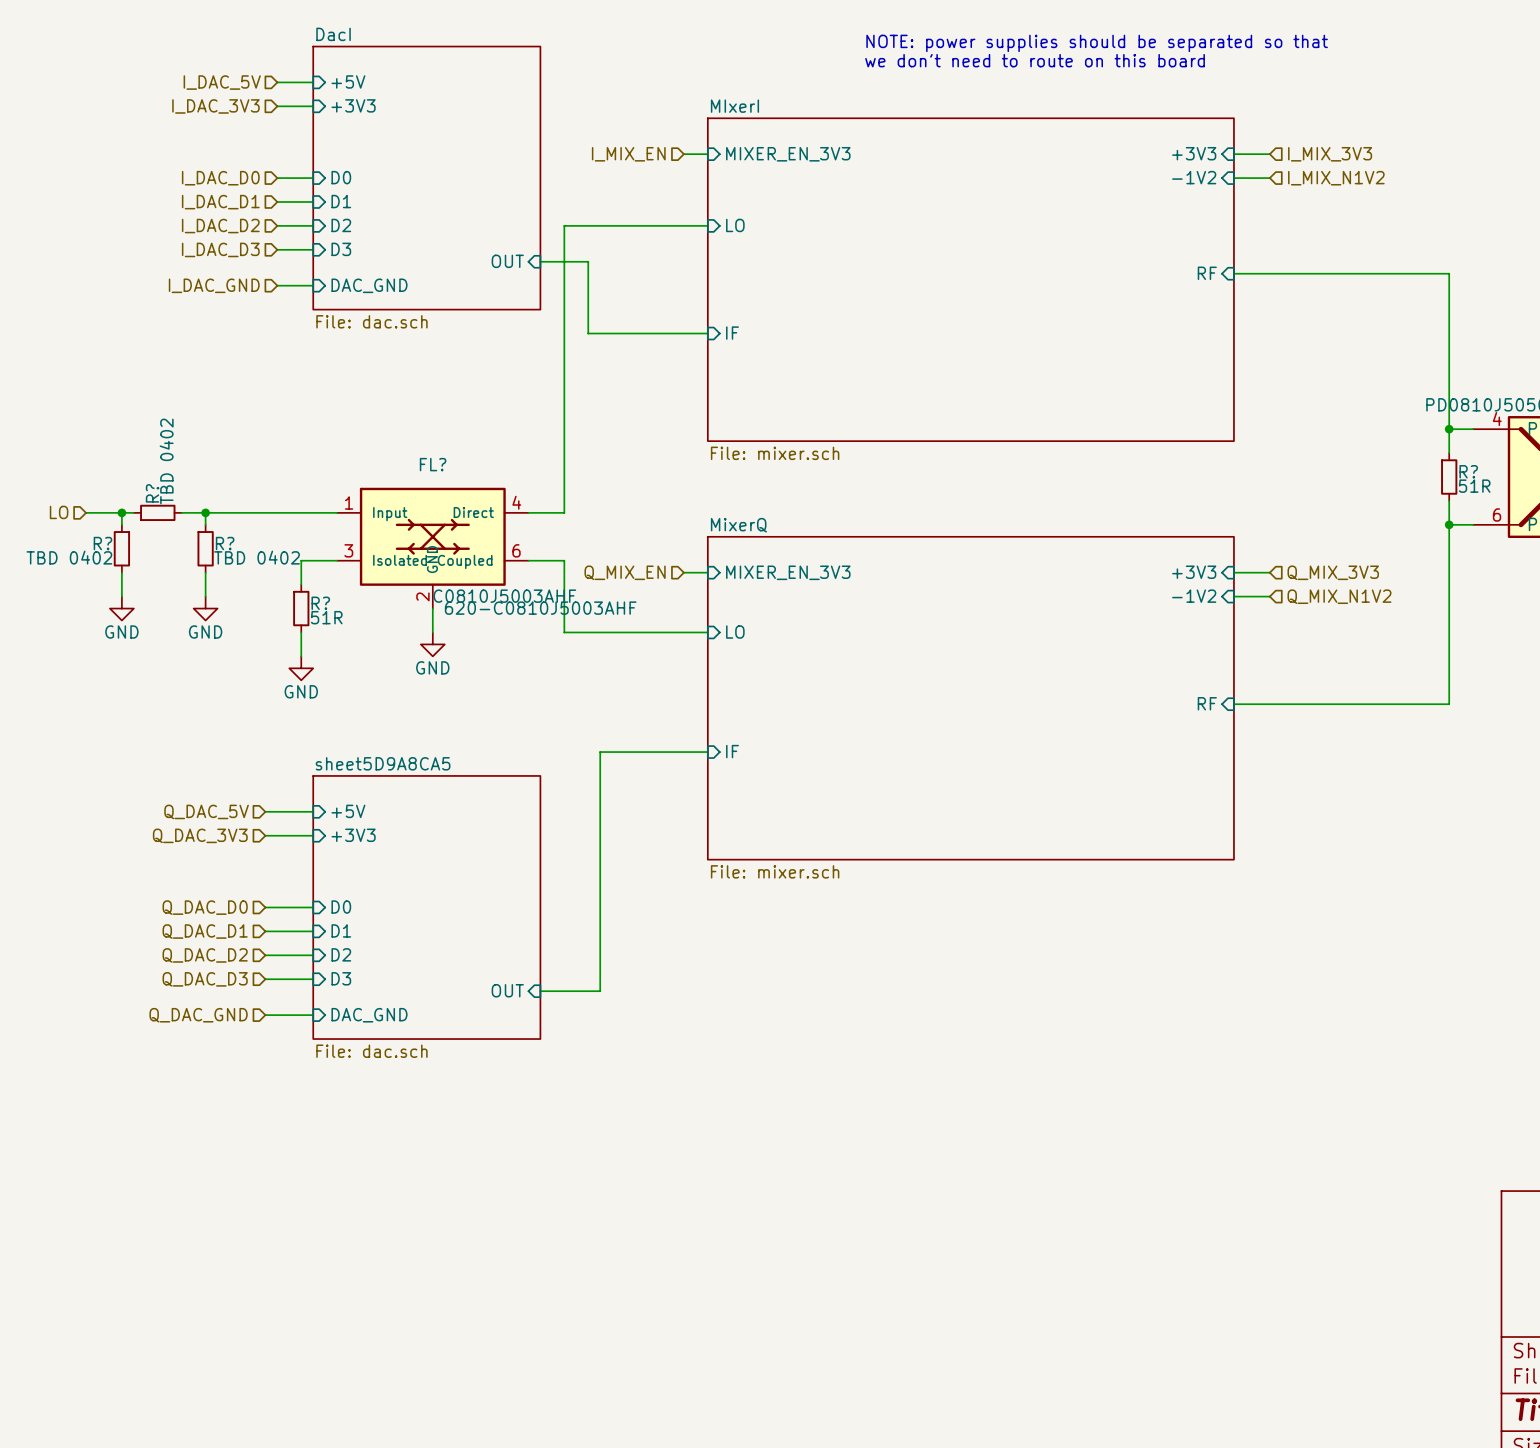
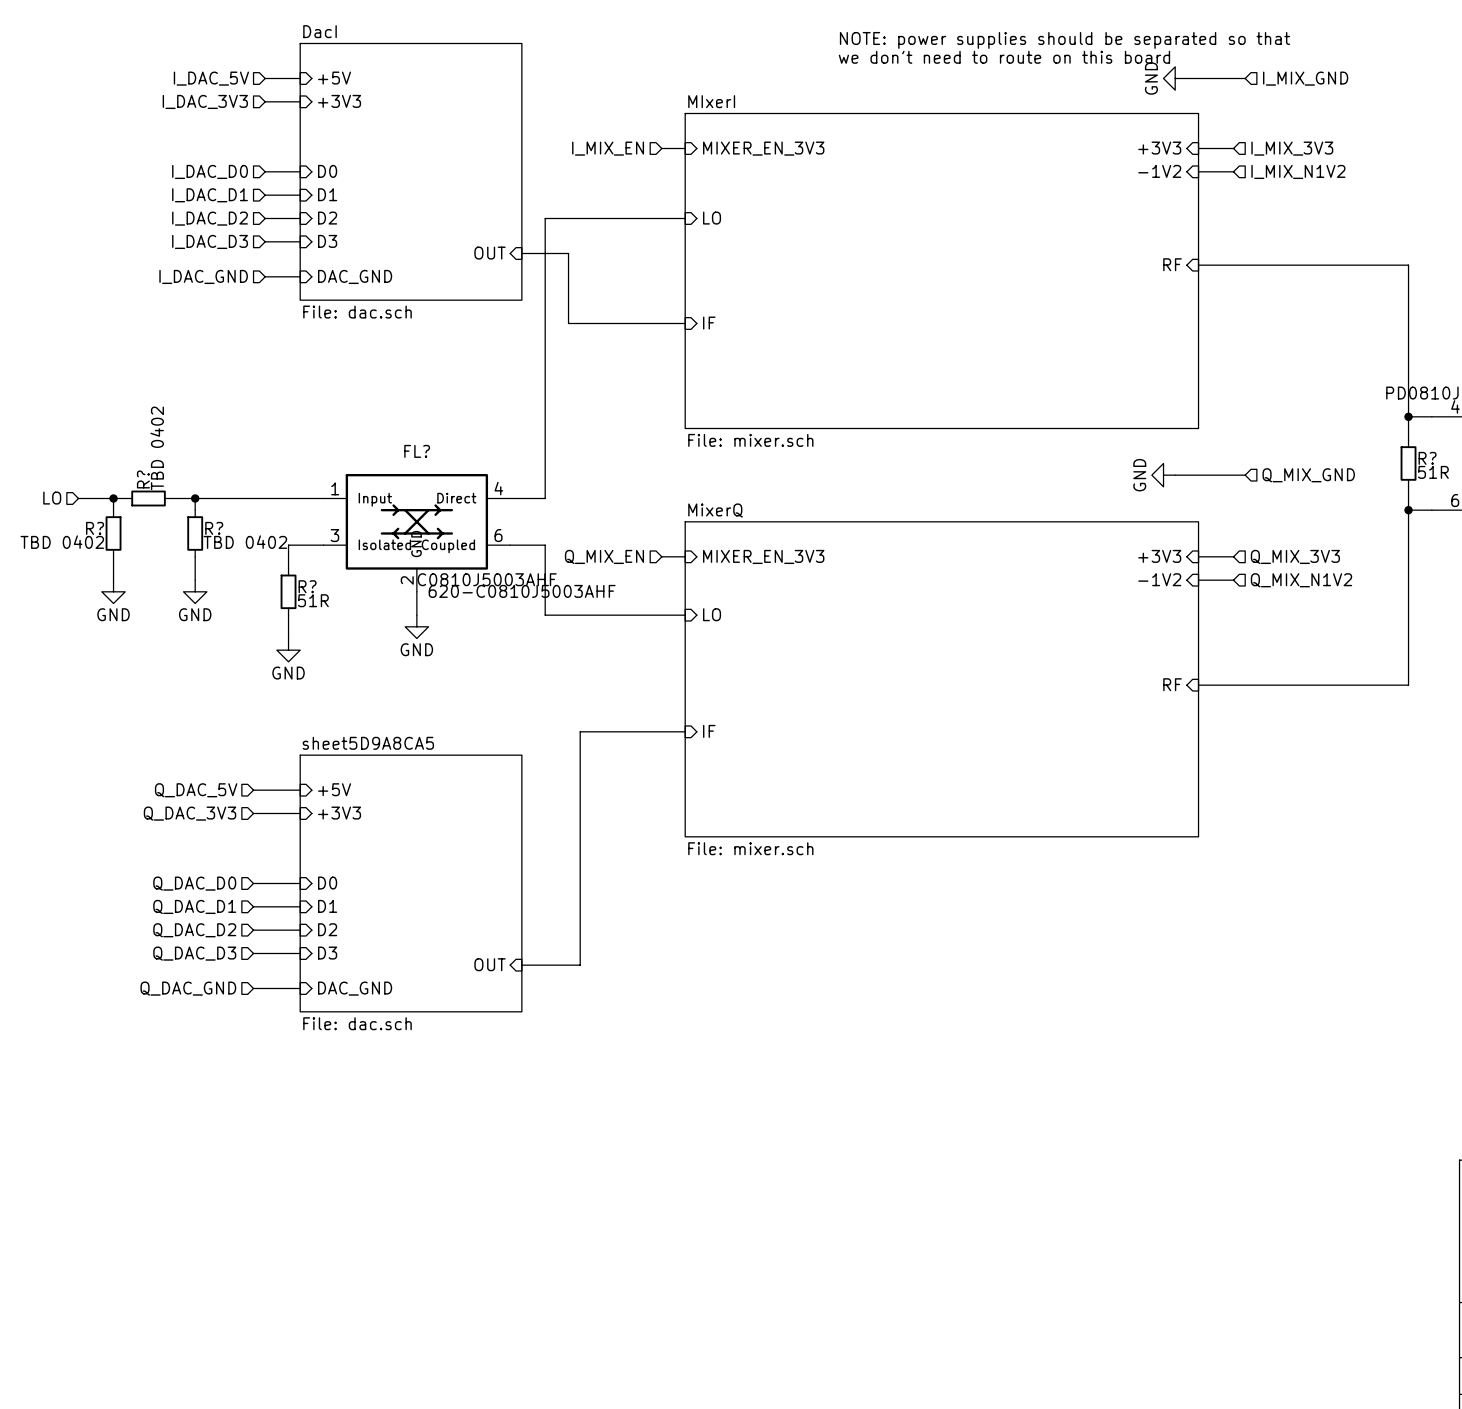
power symbol: none -> GND (1175, 78)
wire: none -> (1186, 78) (1245, 78)
hierarchical label: none -> I_MIX_GND (1305, 78)
power symbol: none -> GND (1163, 475)
wire: none -> (1175, 475) (1245, 475)
hierarchical label: none -> Q_MIX_GND (1308, 475)

